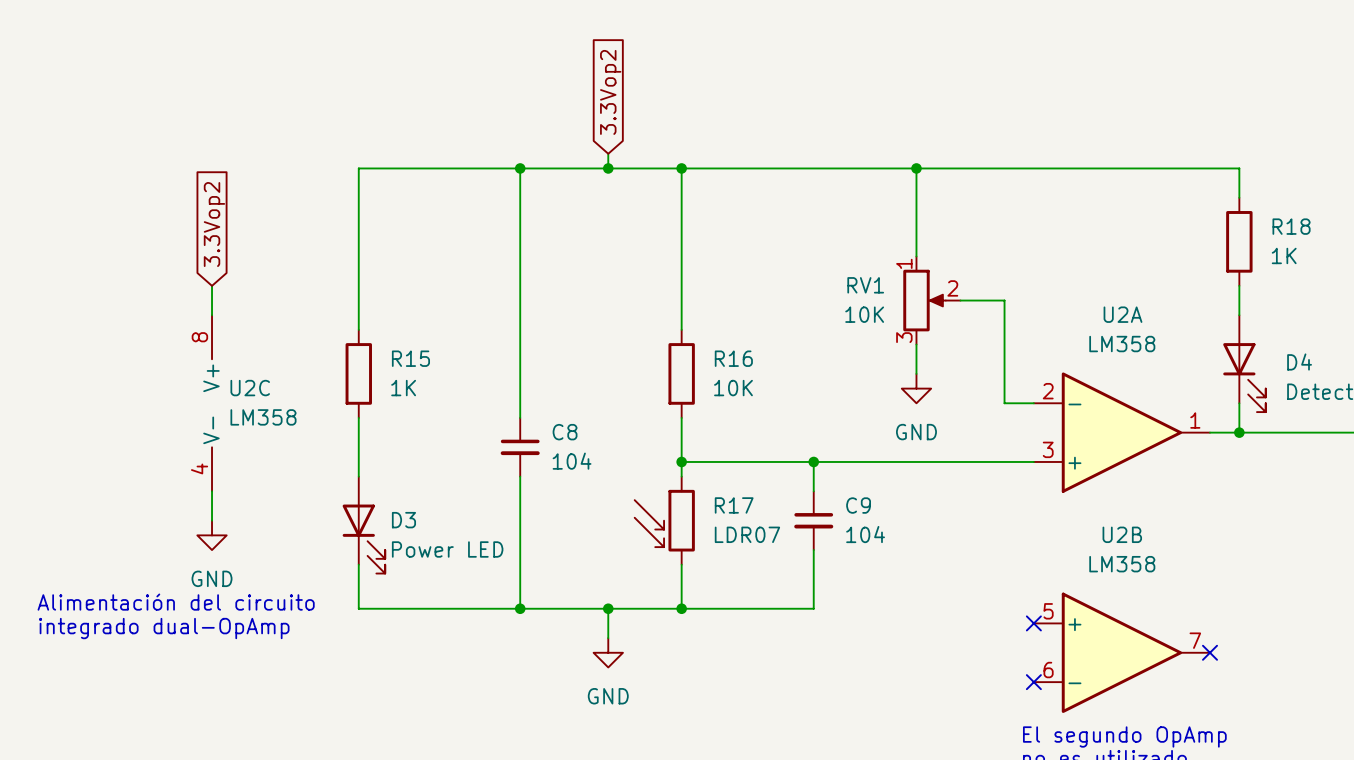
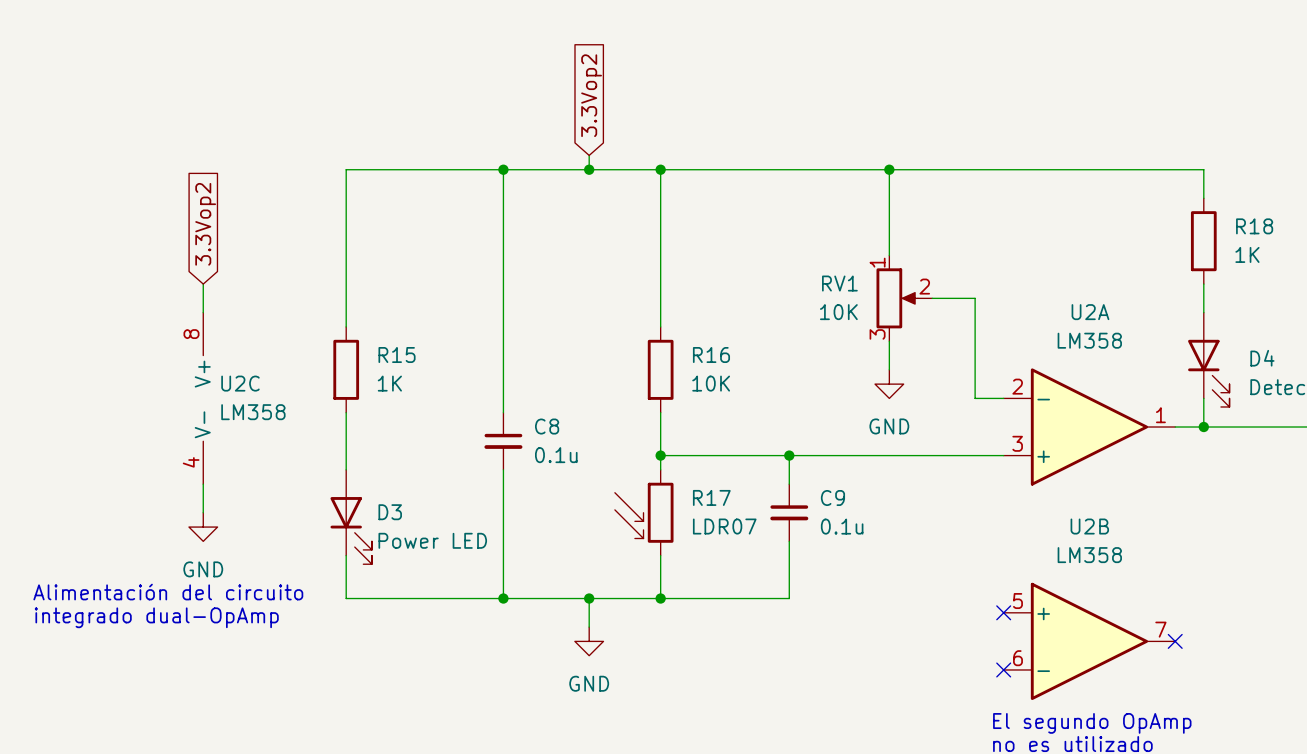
C8 value: 104 (572, 461) -> 0.1u (556, 455)
C9 value: 104 (865, 534) -> 0.1u (842, 526)

